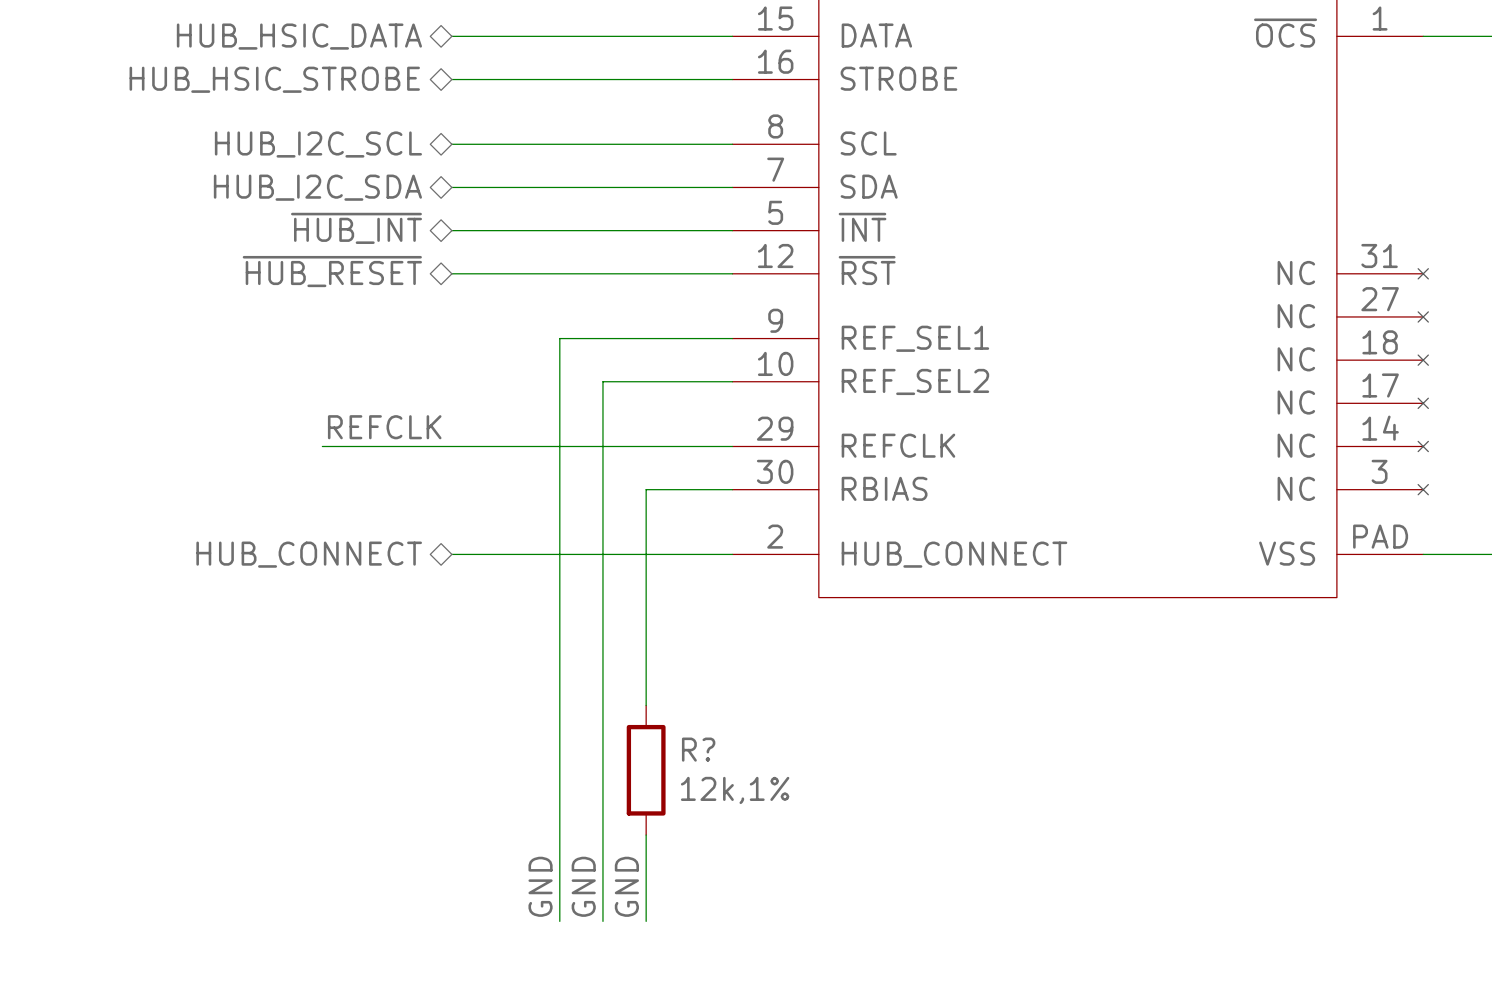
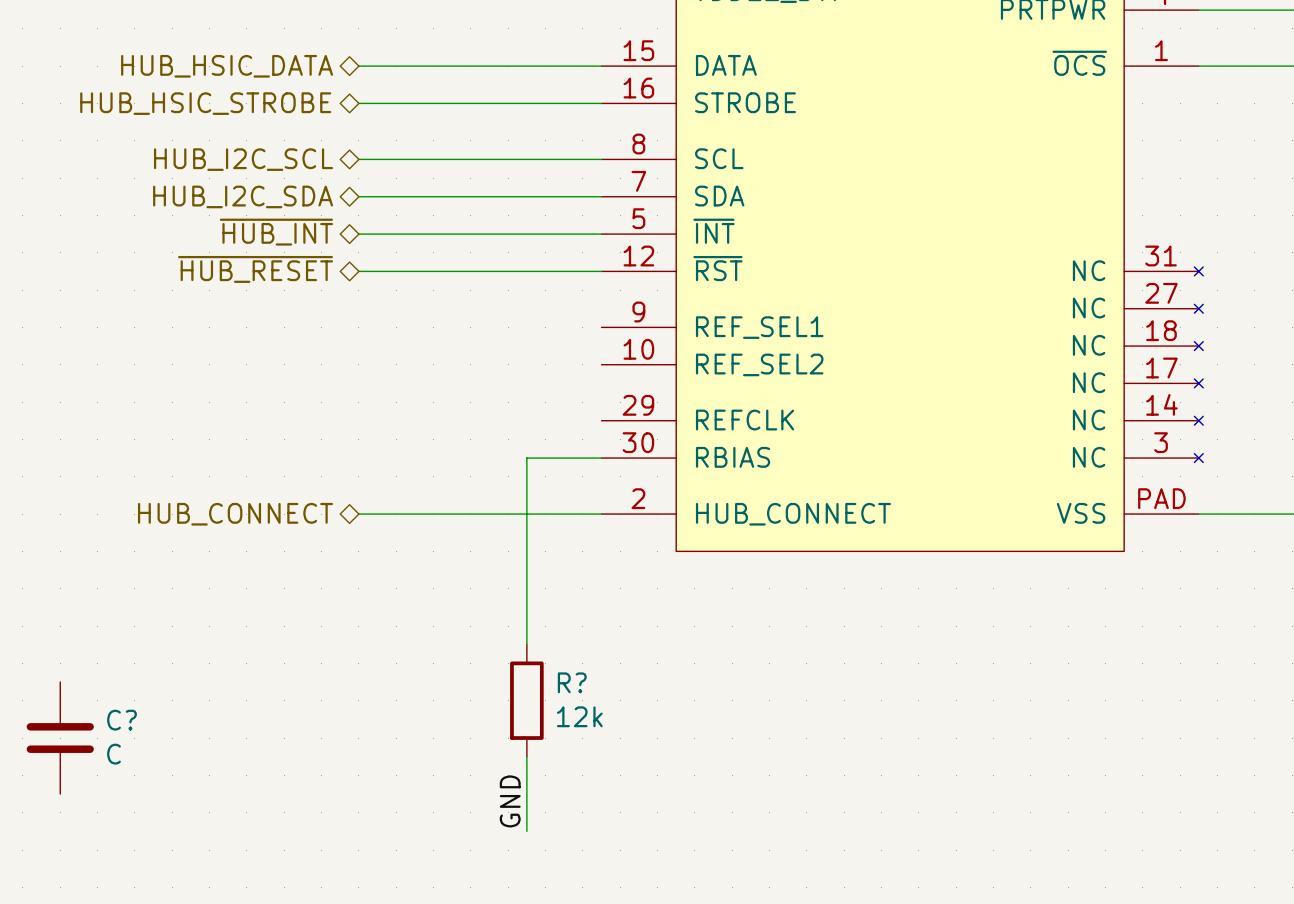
wire: (732, 338) (559, 338) (559, 921) -> none
wire: (732, 381) (602, 381) (602, 921) -> none
label: REFCLK (384, 427) -> none
wire: (322, 446) (732, 446) -> none
R? value: 12k,1% (735, 790) -> 12k (579, 716)
C?: none -> C (60, 738)
label: GND (540, 886) -> none
label: GND (583, 886) -> none

